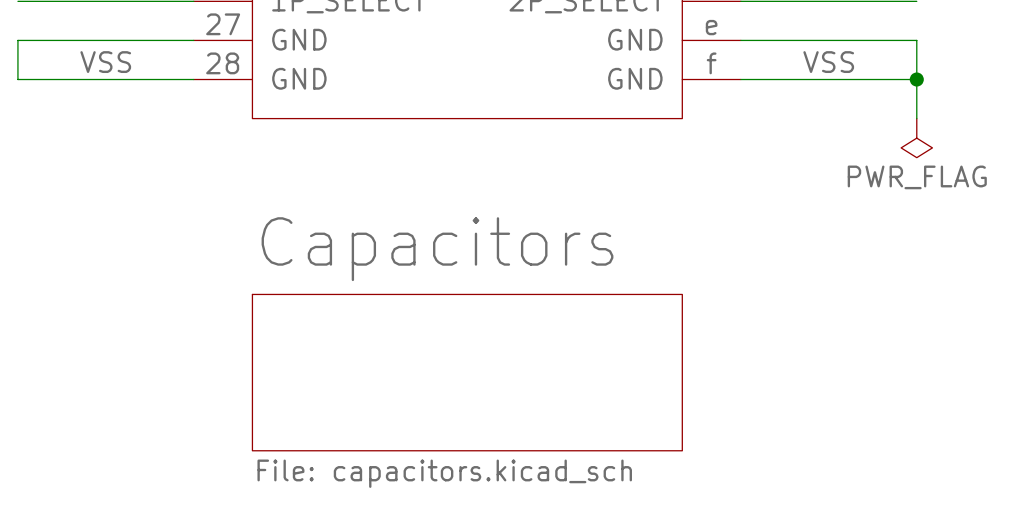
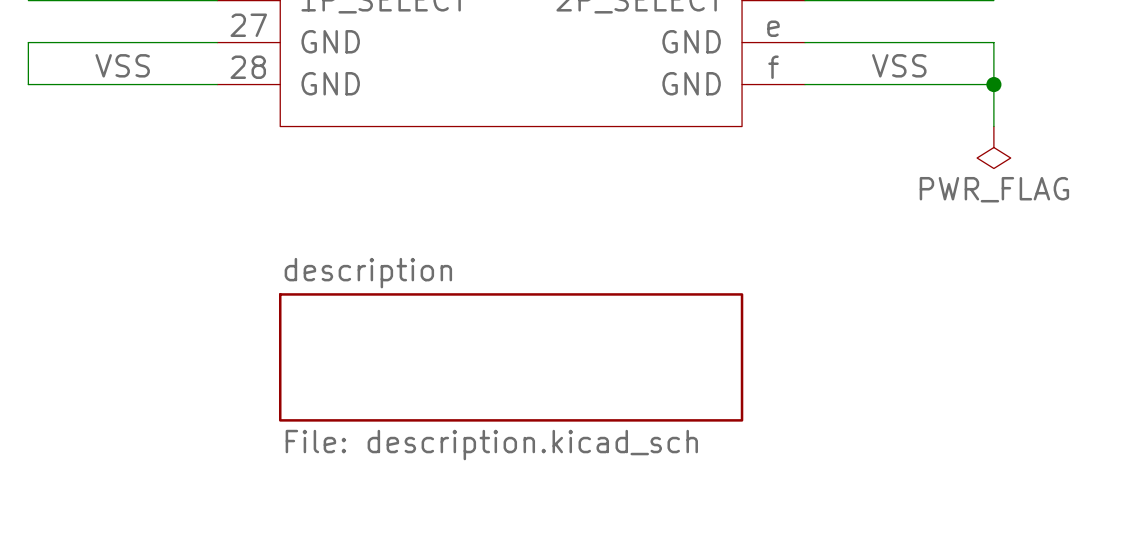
sheet description: none -> File: description.kicad_sch (511, 357)
sheet Capacitors: File: capacitors.kicad_sch (467, 372) -> none

